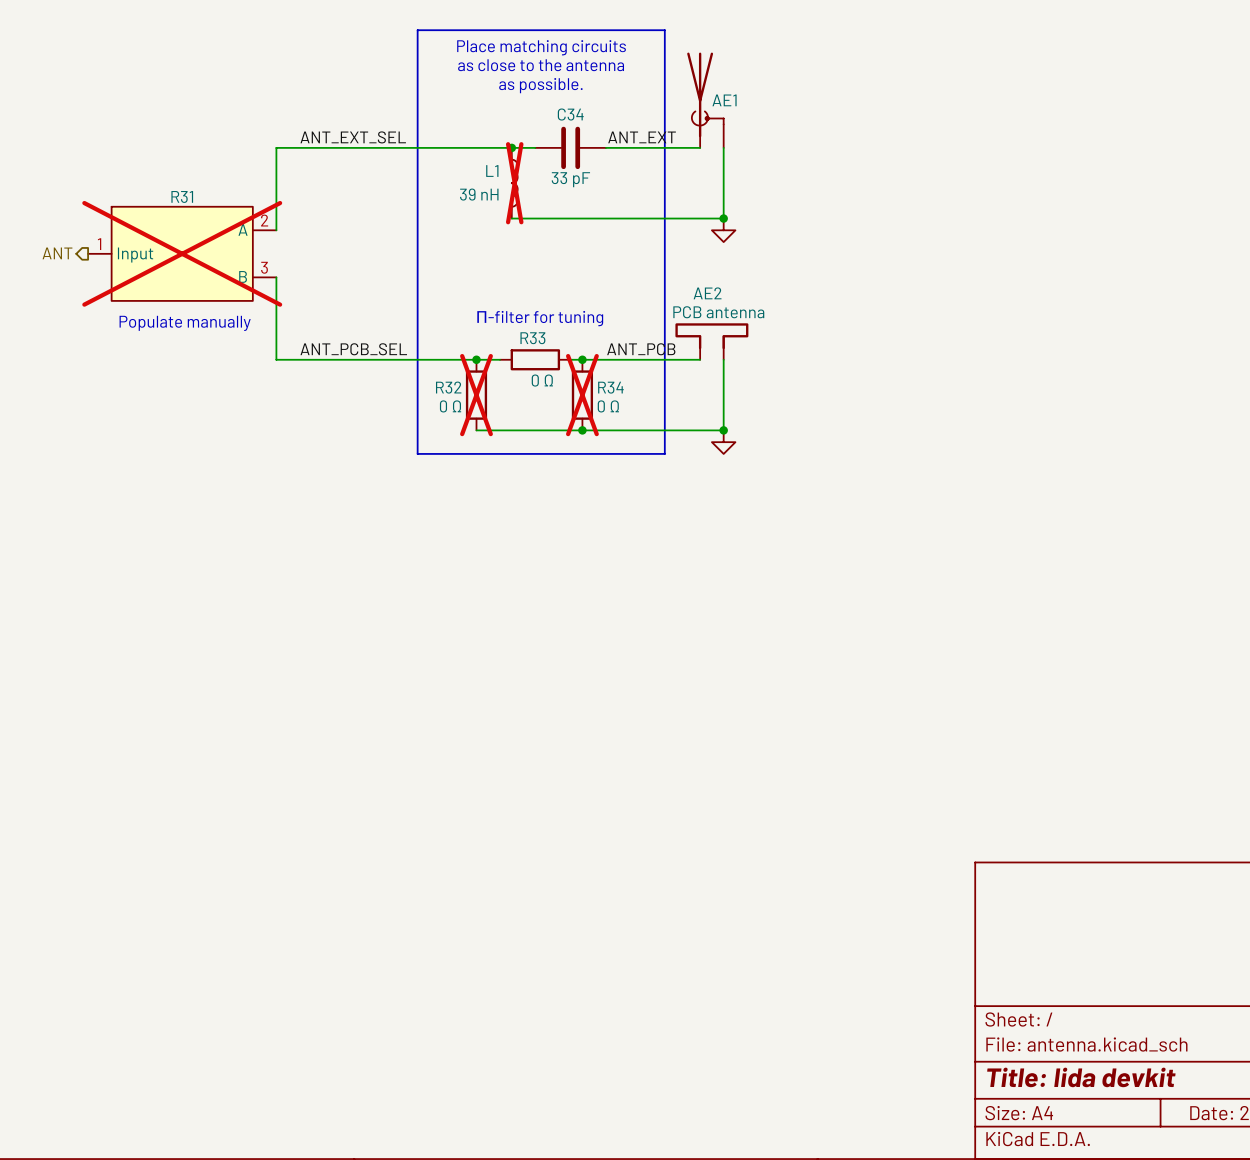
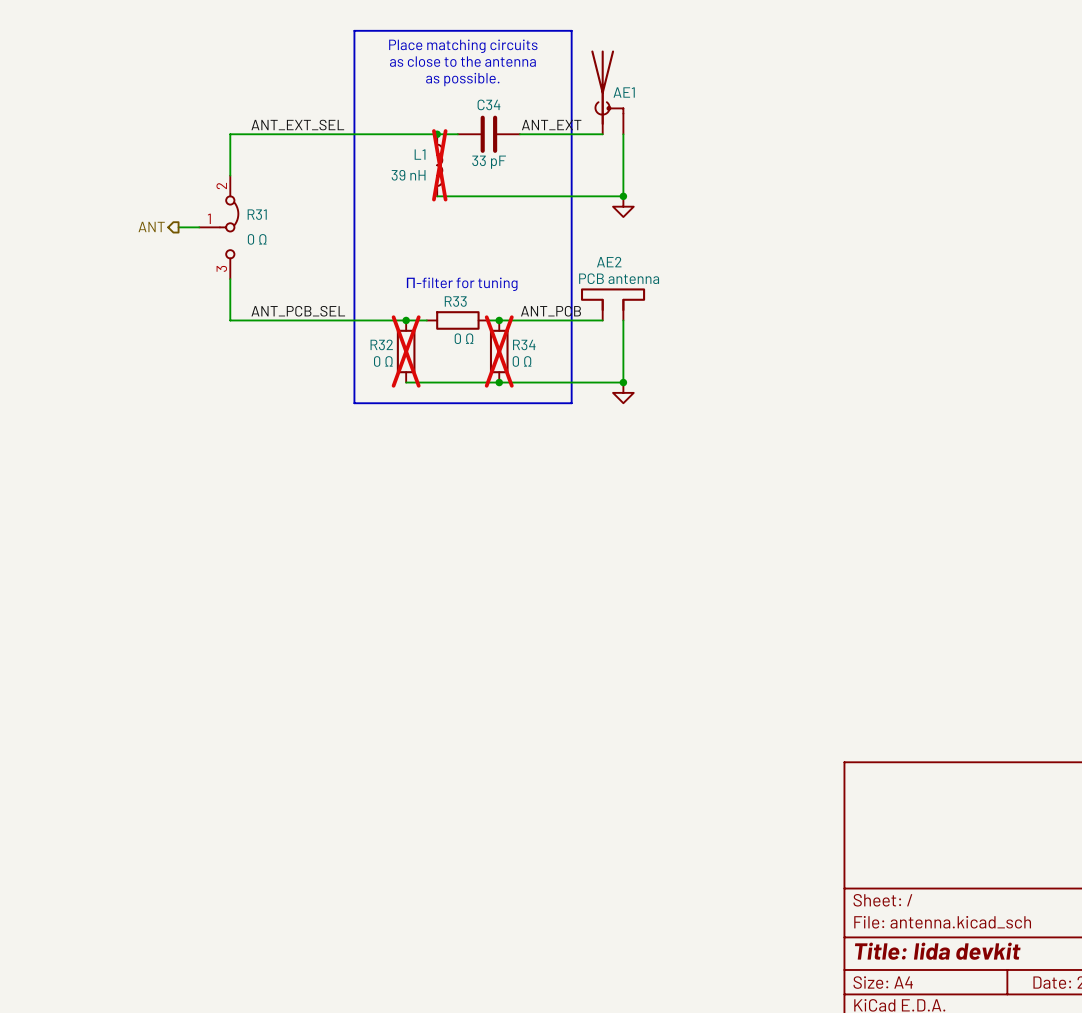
R31 name position: R31 (182, 196) -> R31 (257, 214)
R31 symbol: [88, 206, 277, 301] -> [199, 175, 239, 280]
hierarchical label position: ANT (57, 253) -> ANT (151, 226)
R31 do-not-place cross: (182, 253) -> none
R31 value: none -> 0 Ω (257, 239)
text: Populate manually (185, 323) -> none

